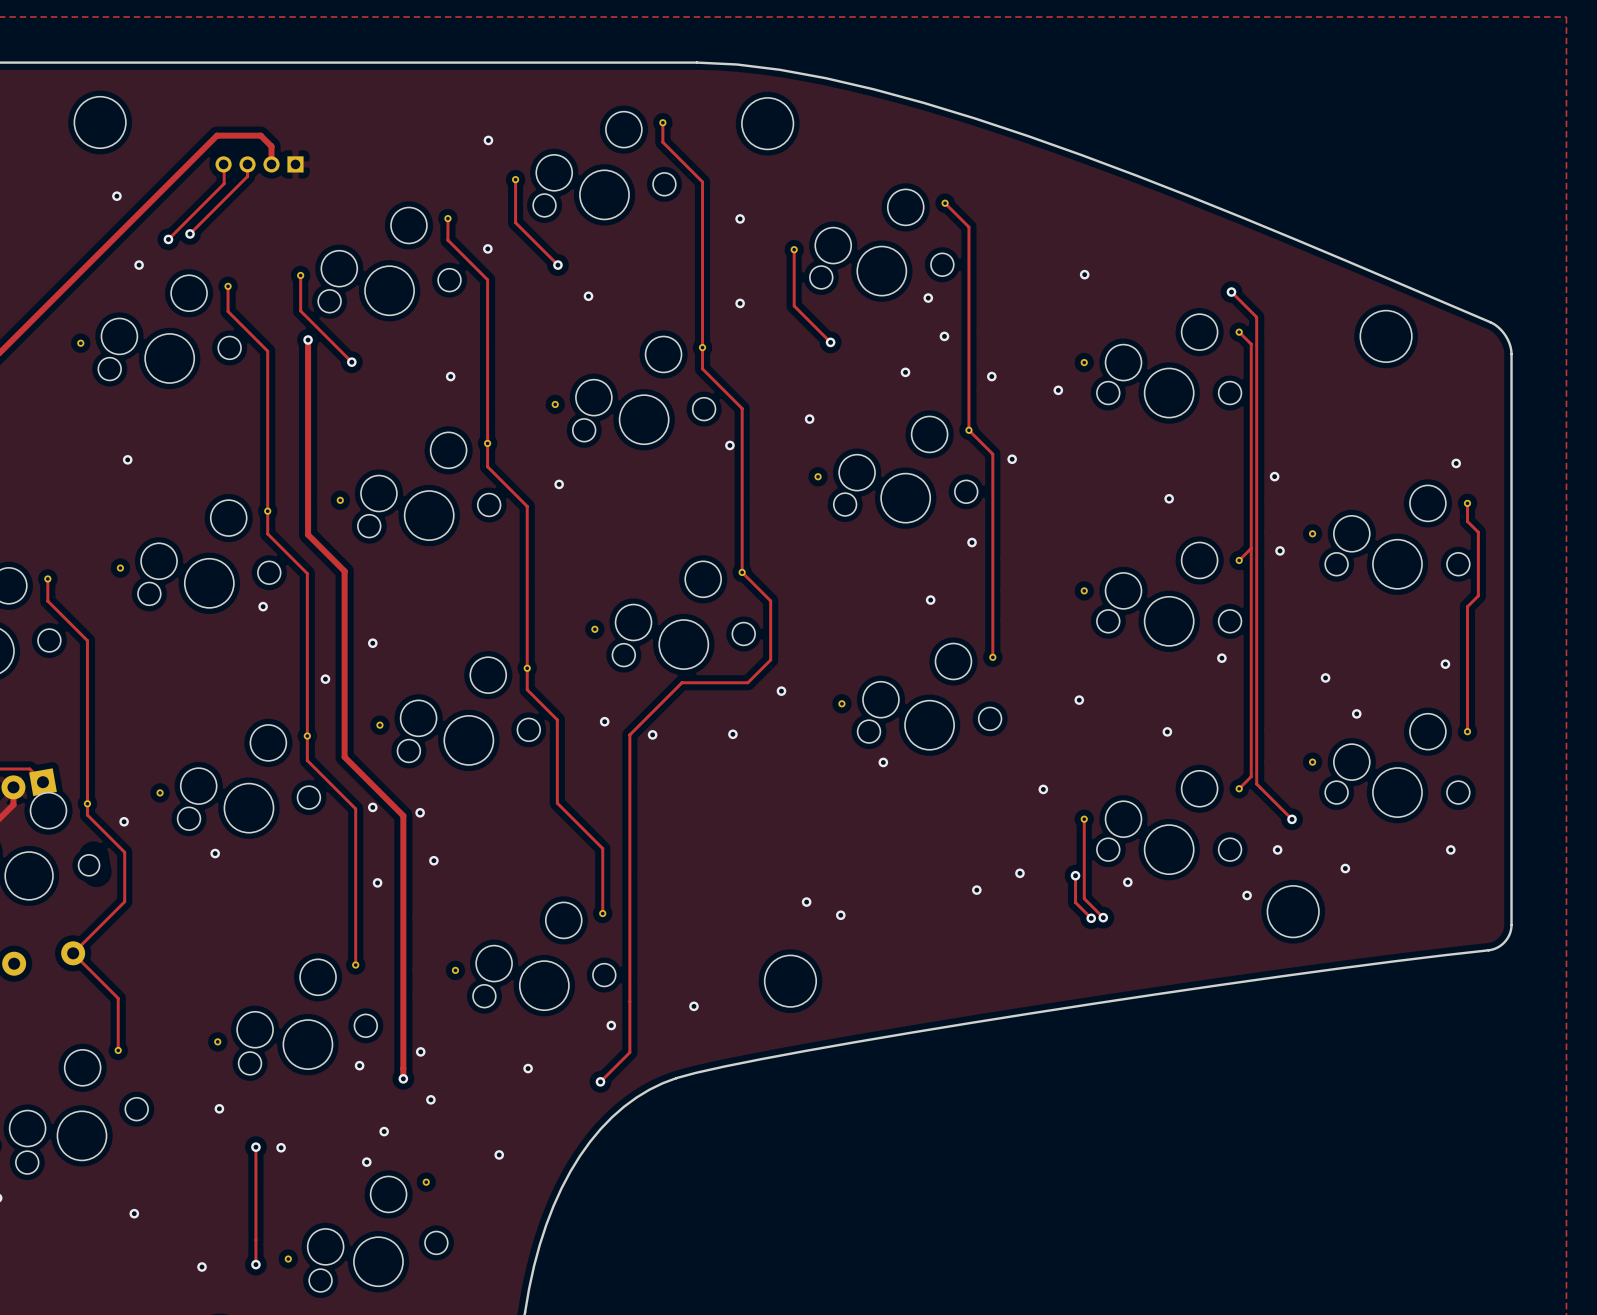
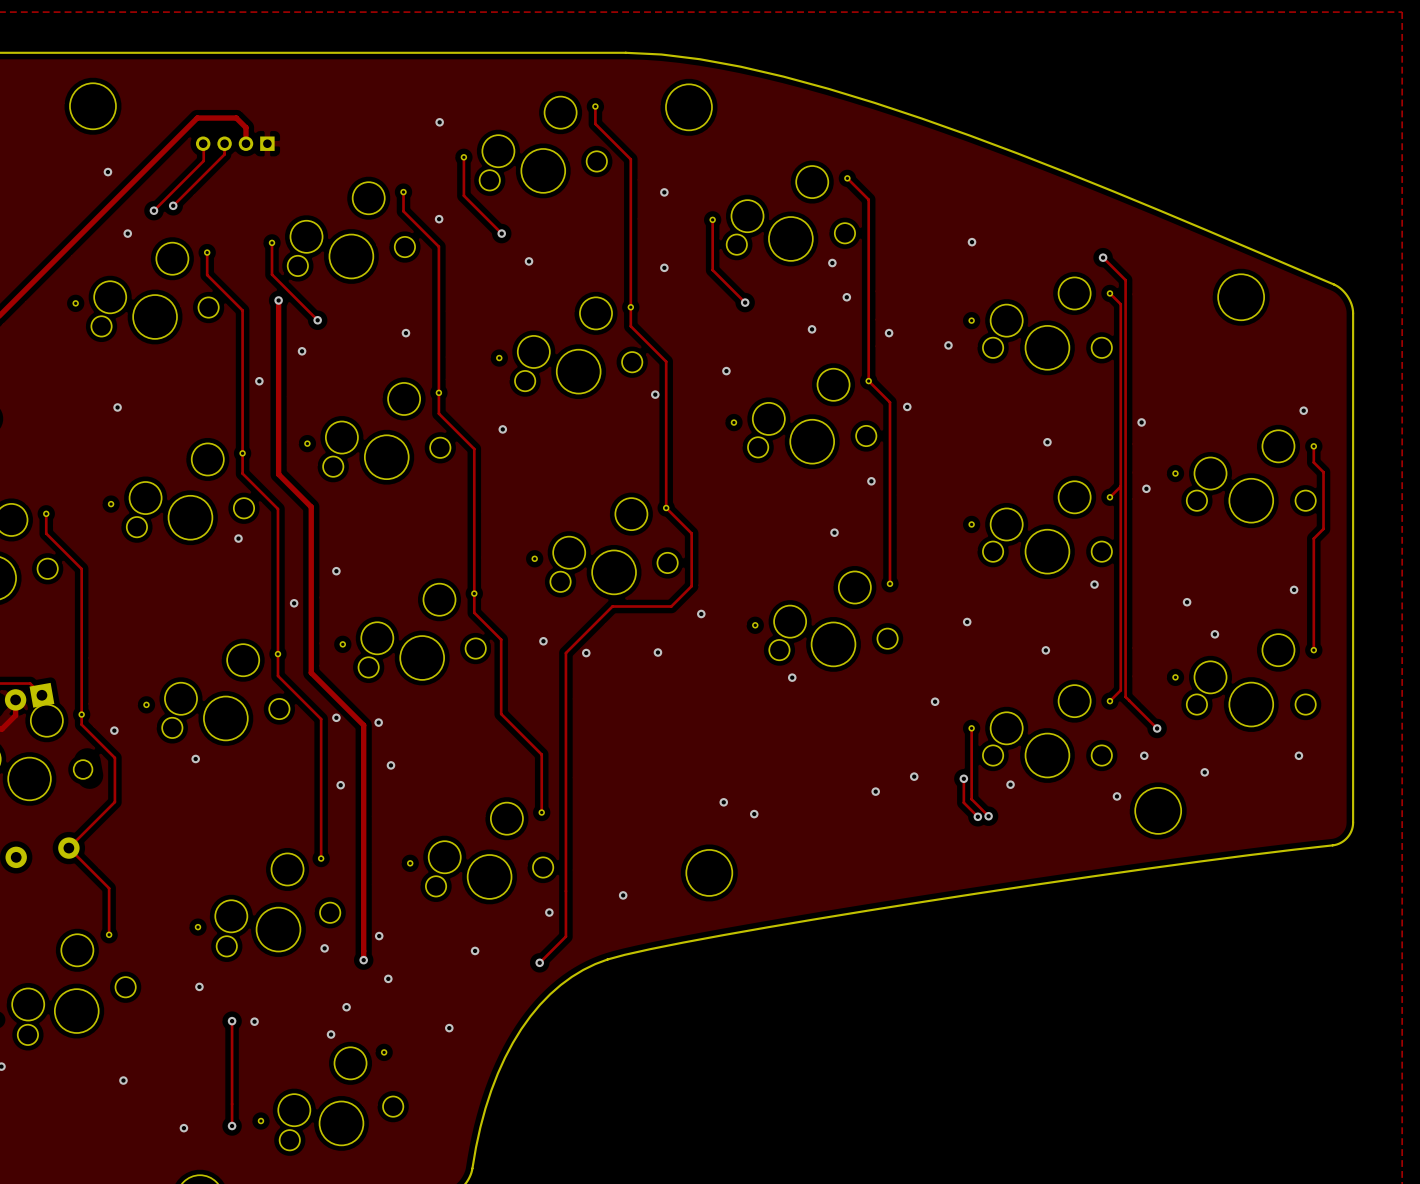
via: none -> (302, 351)
via: none -> (259, 381)

